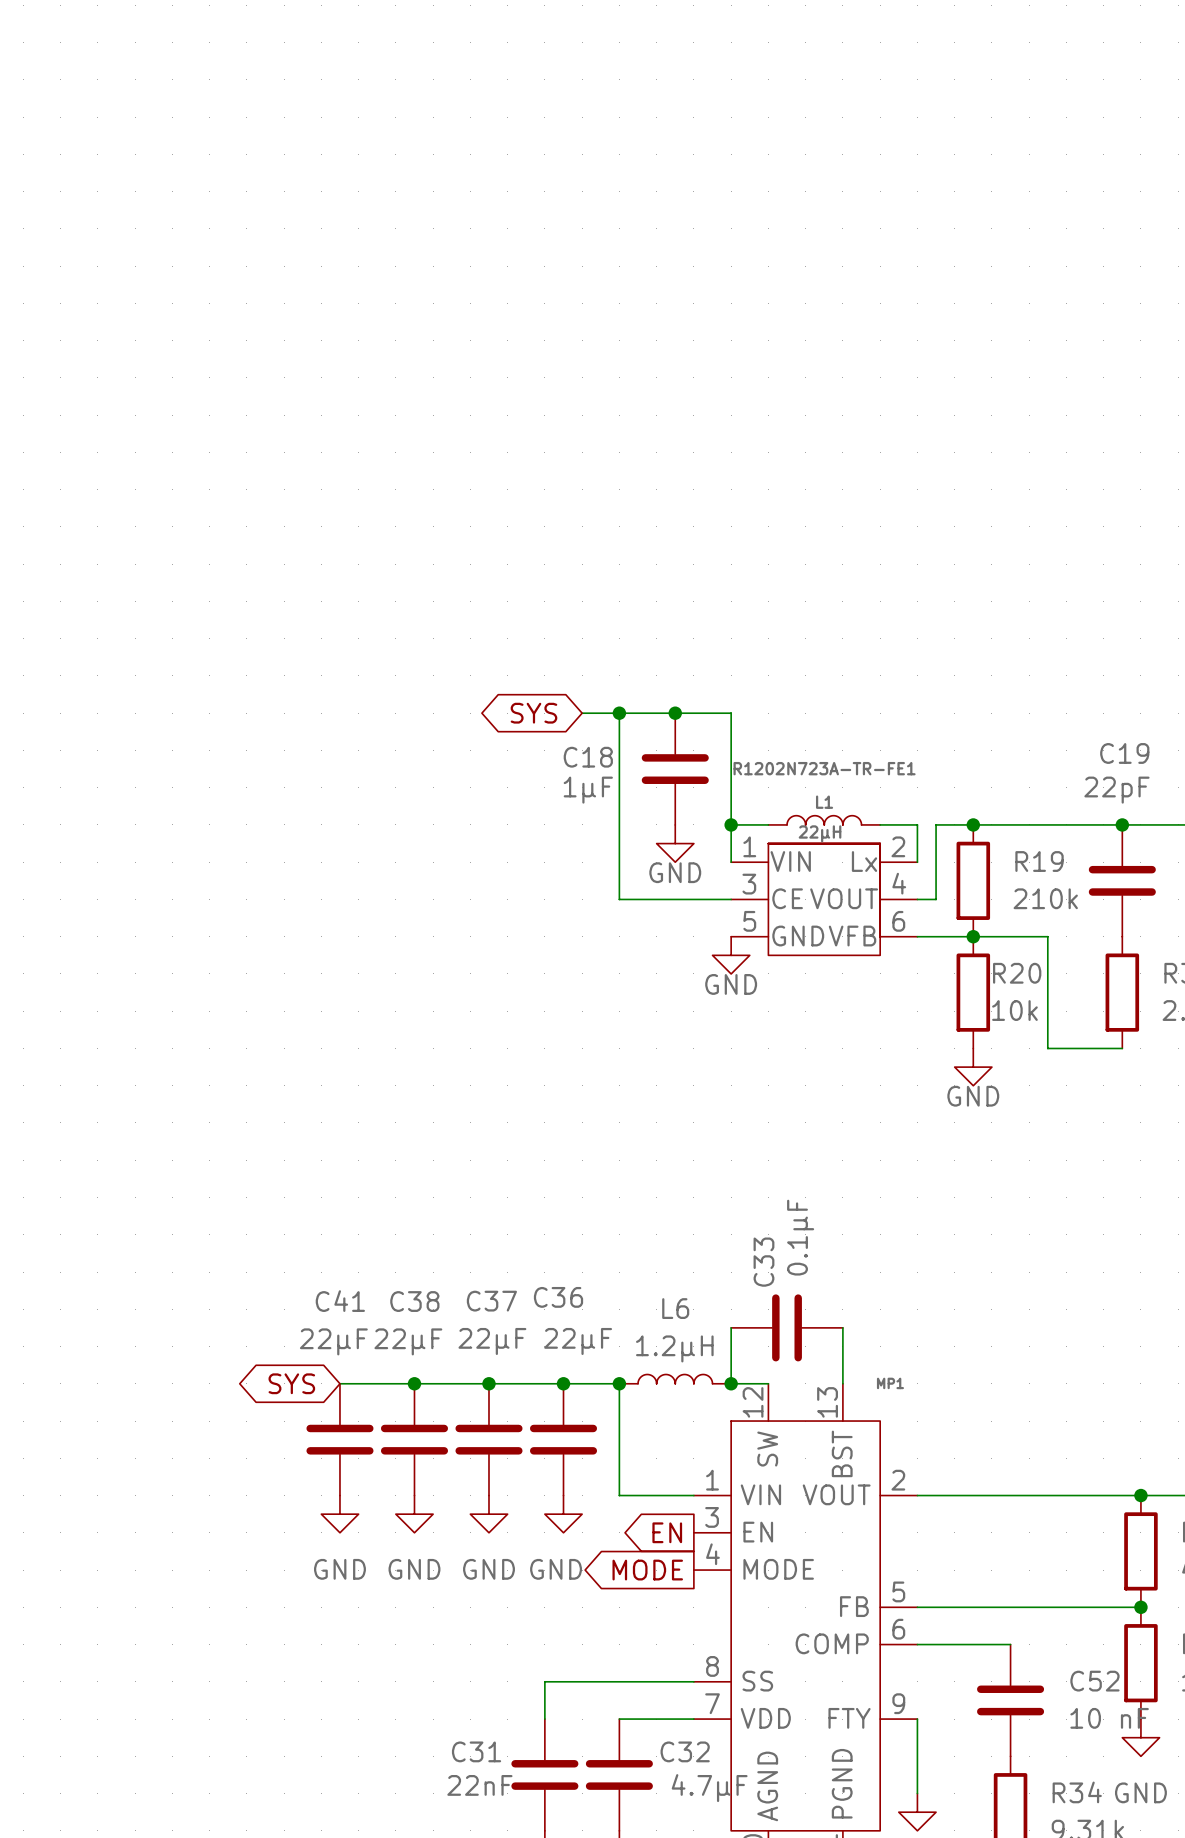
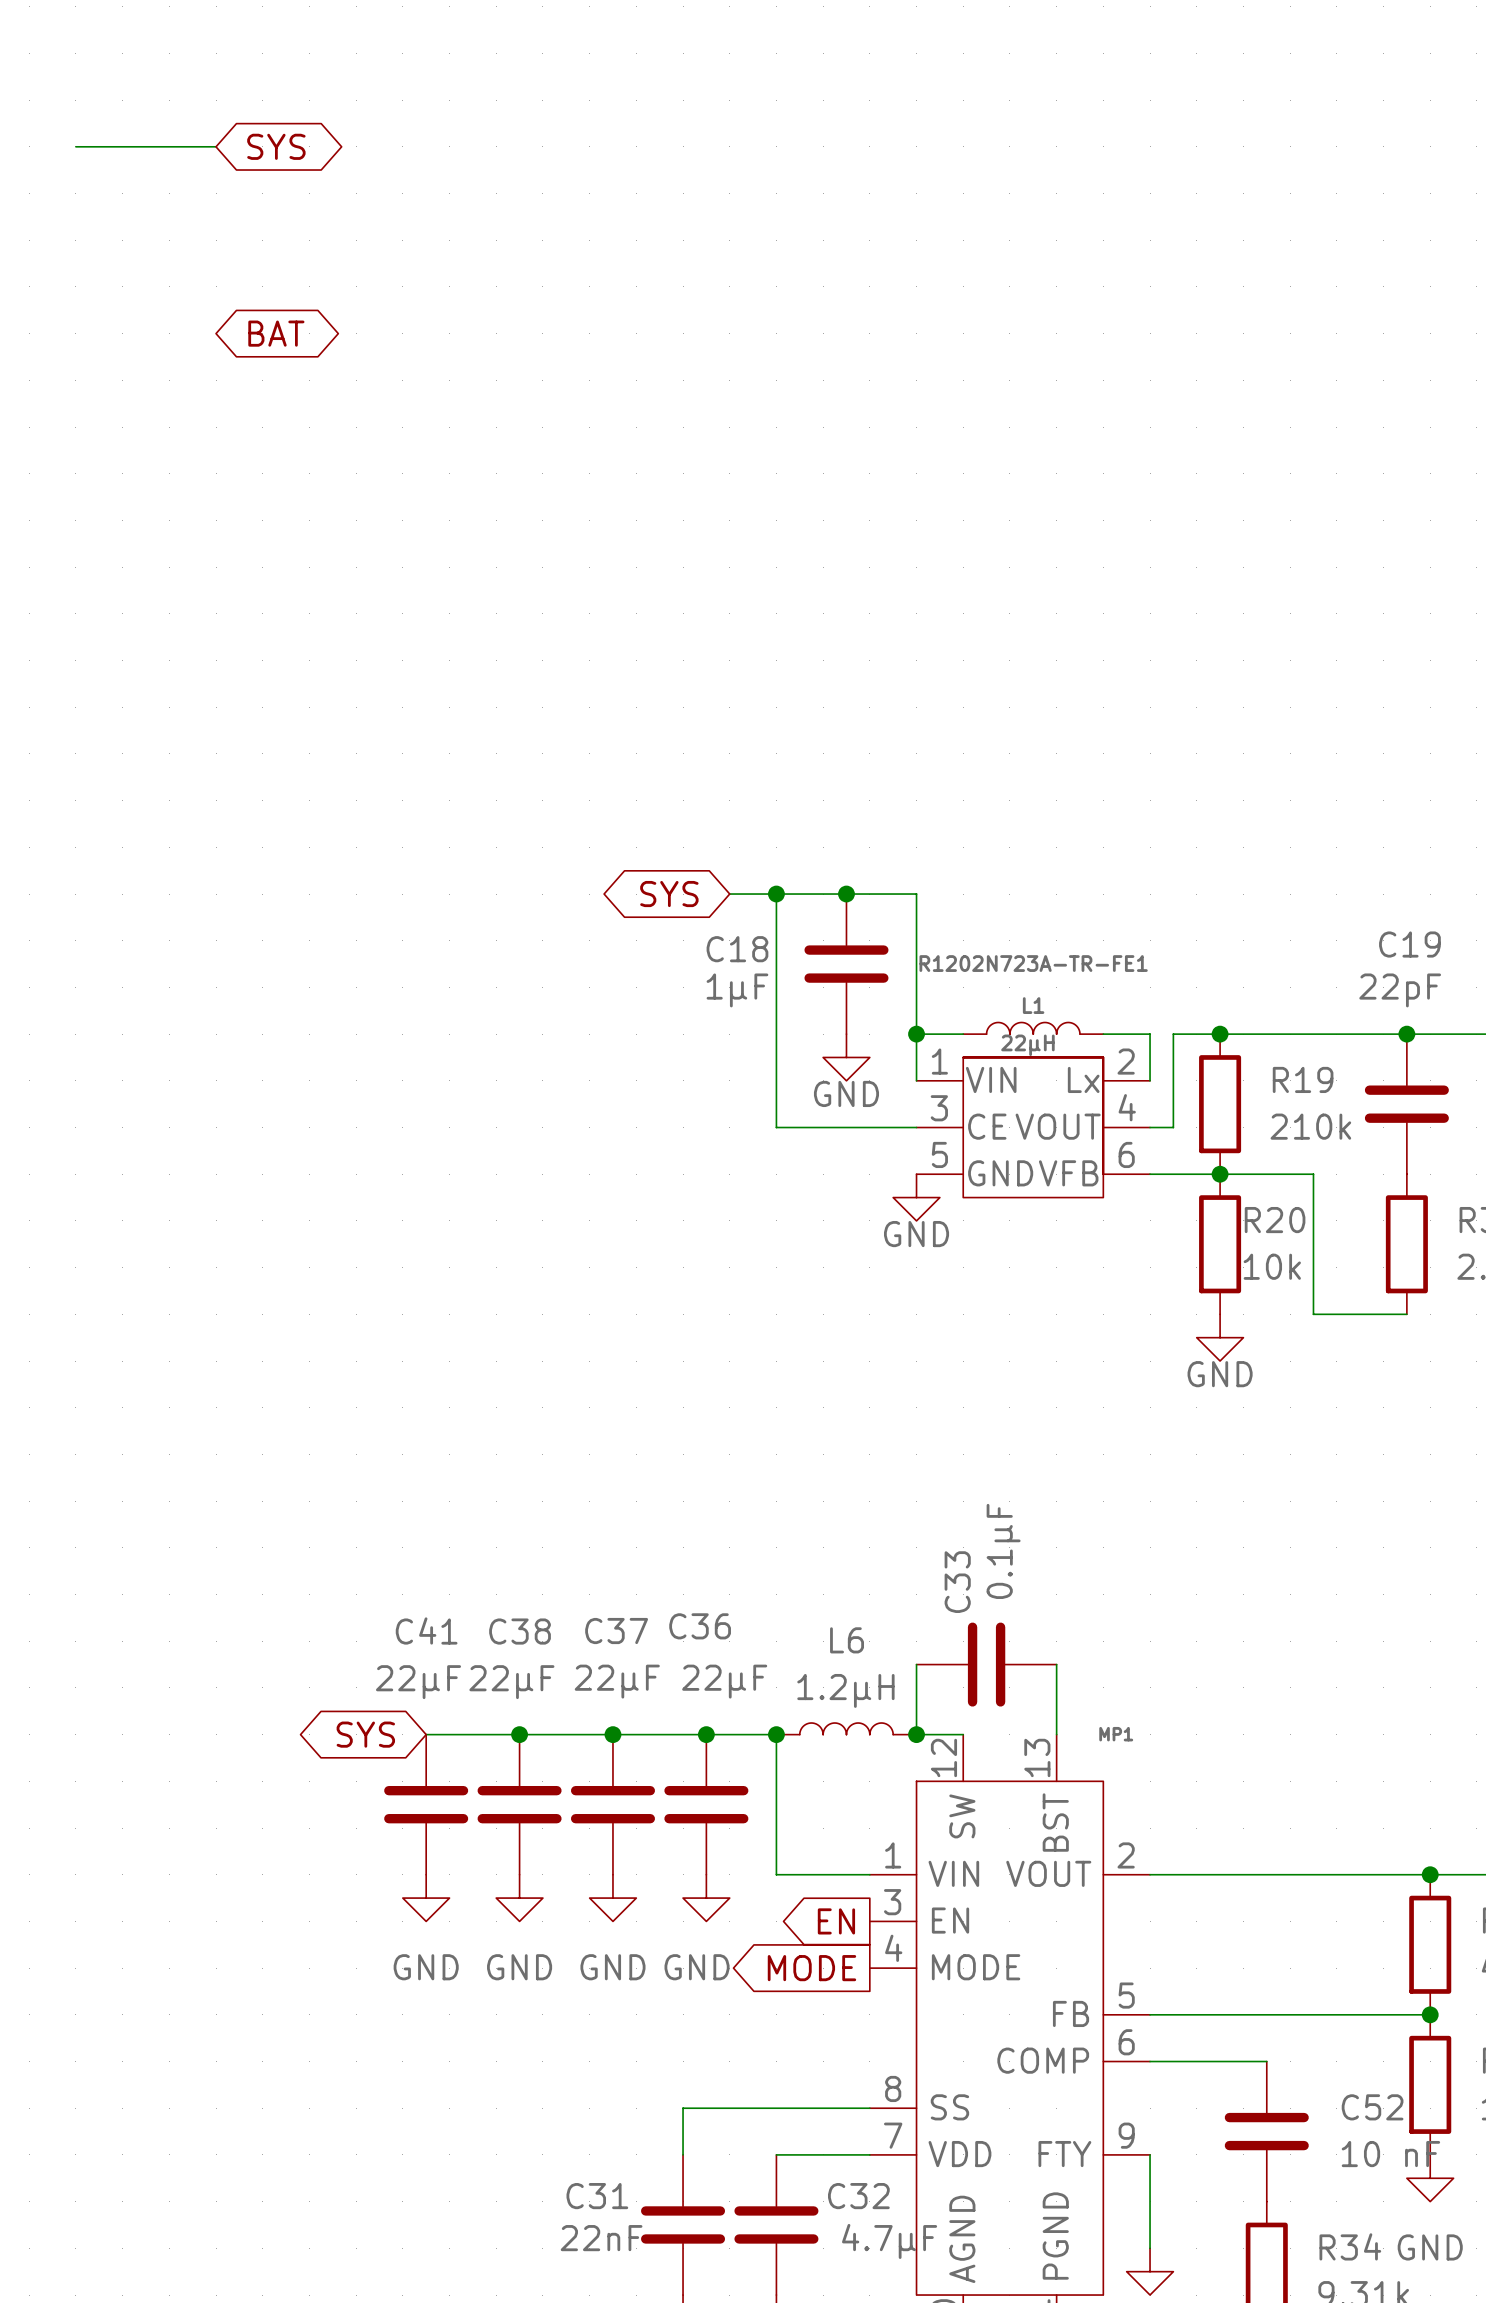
wire: none -> (75, 146) (216, 146)
global label: none -> SYS (276, 146)
global label: none -> BAT (276, 333)

